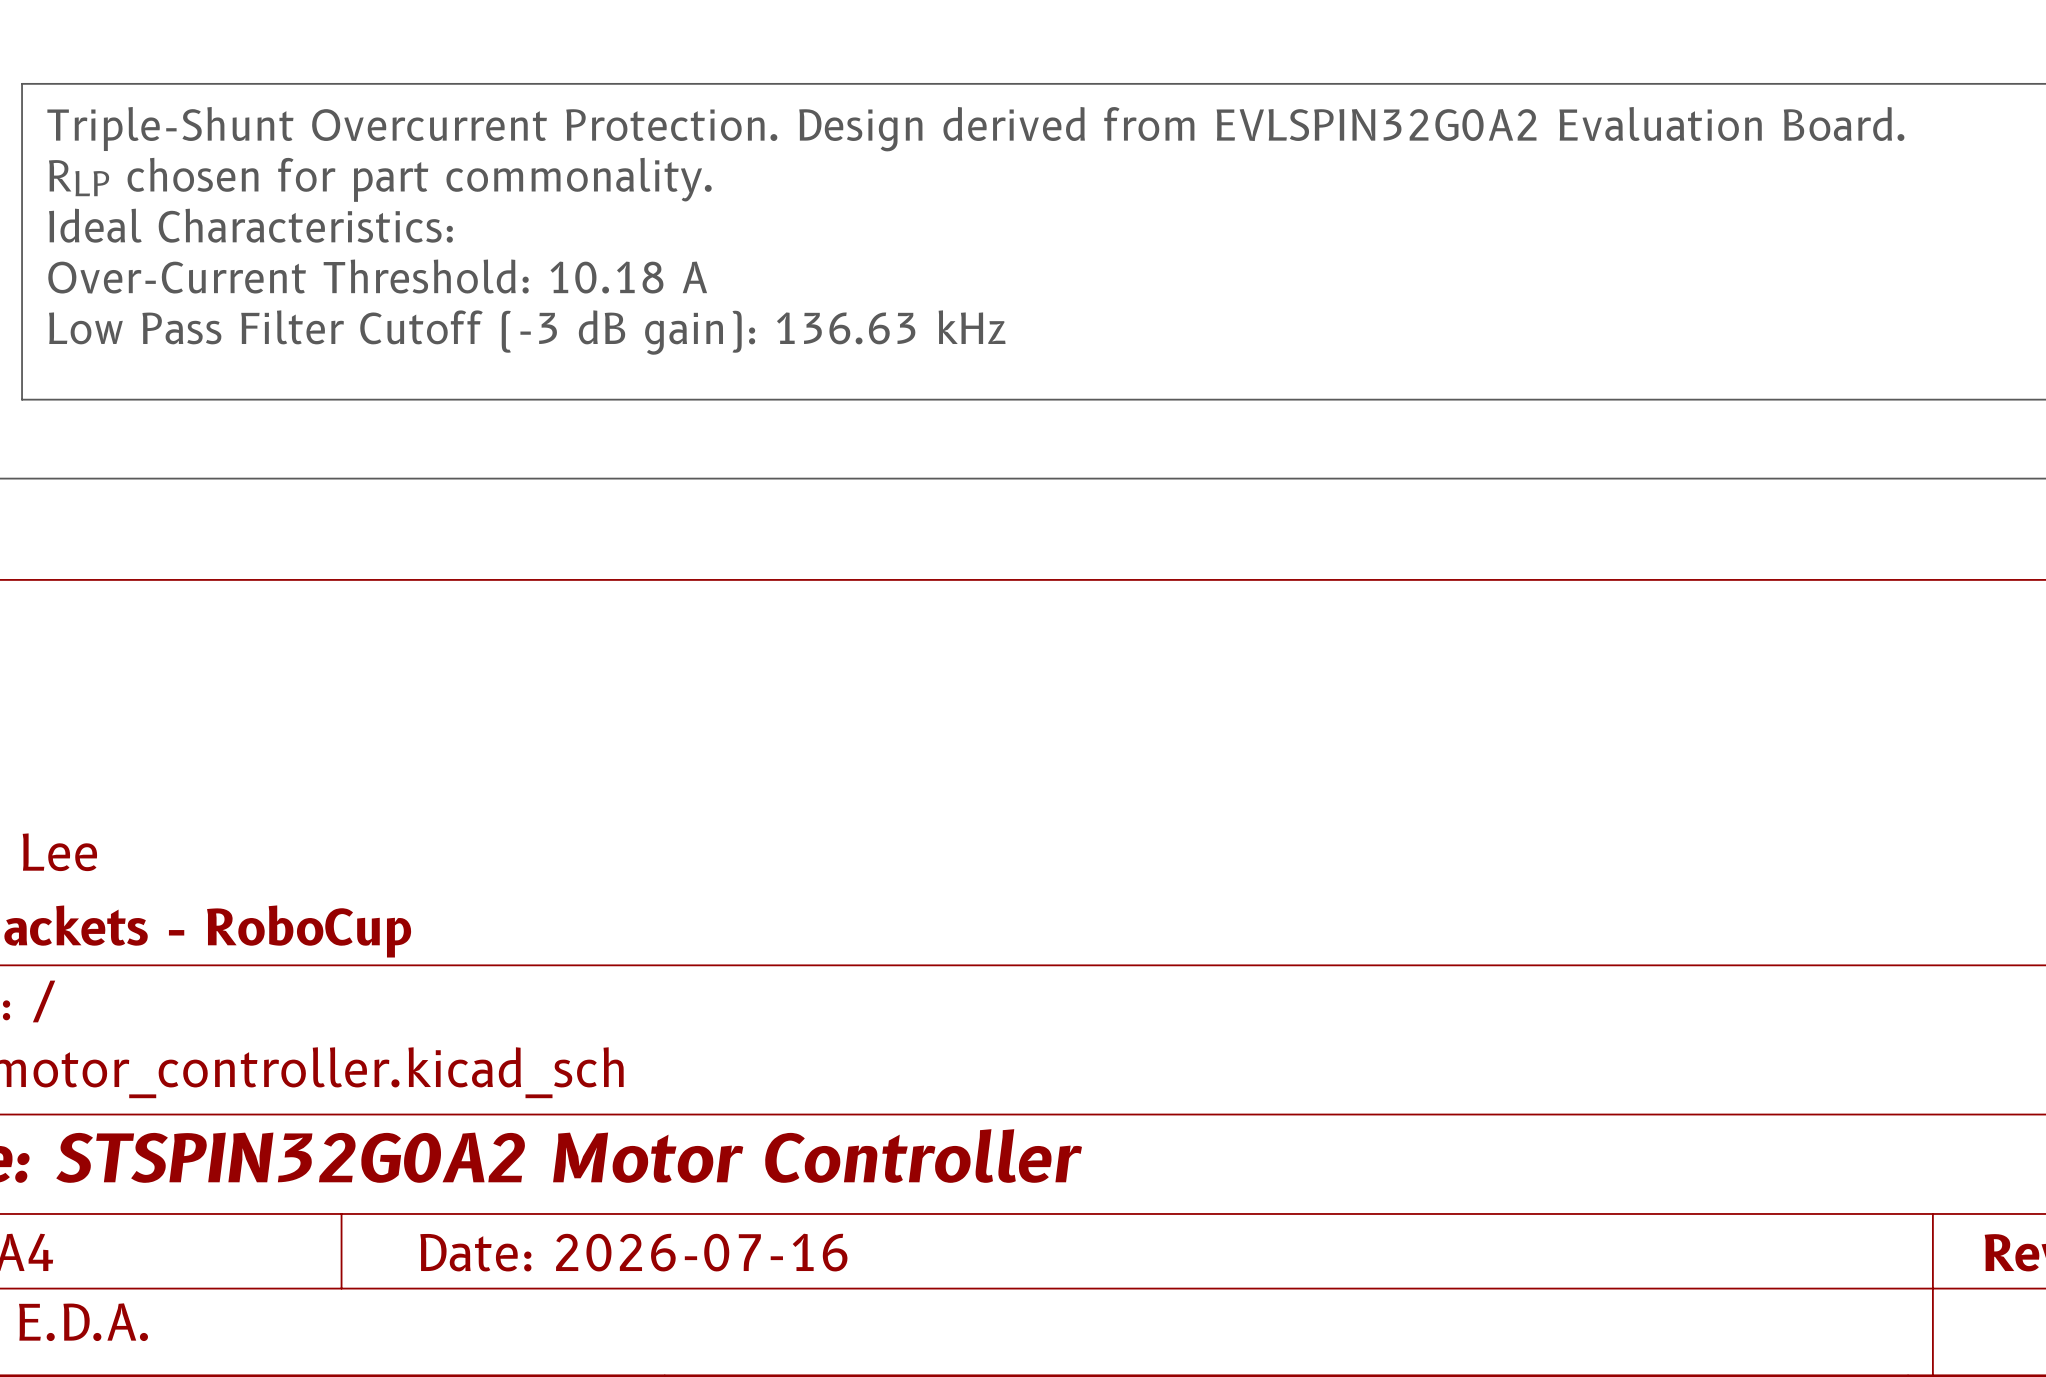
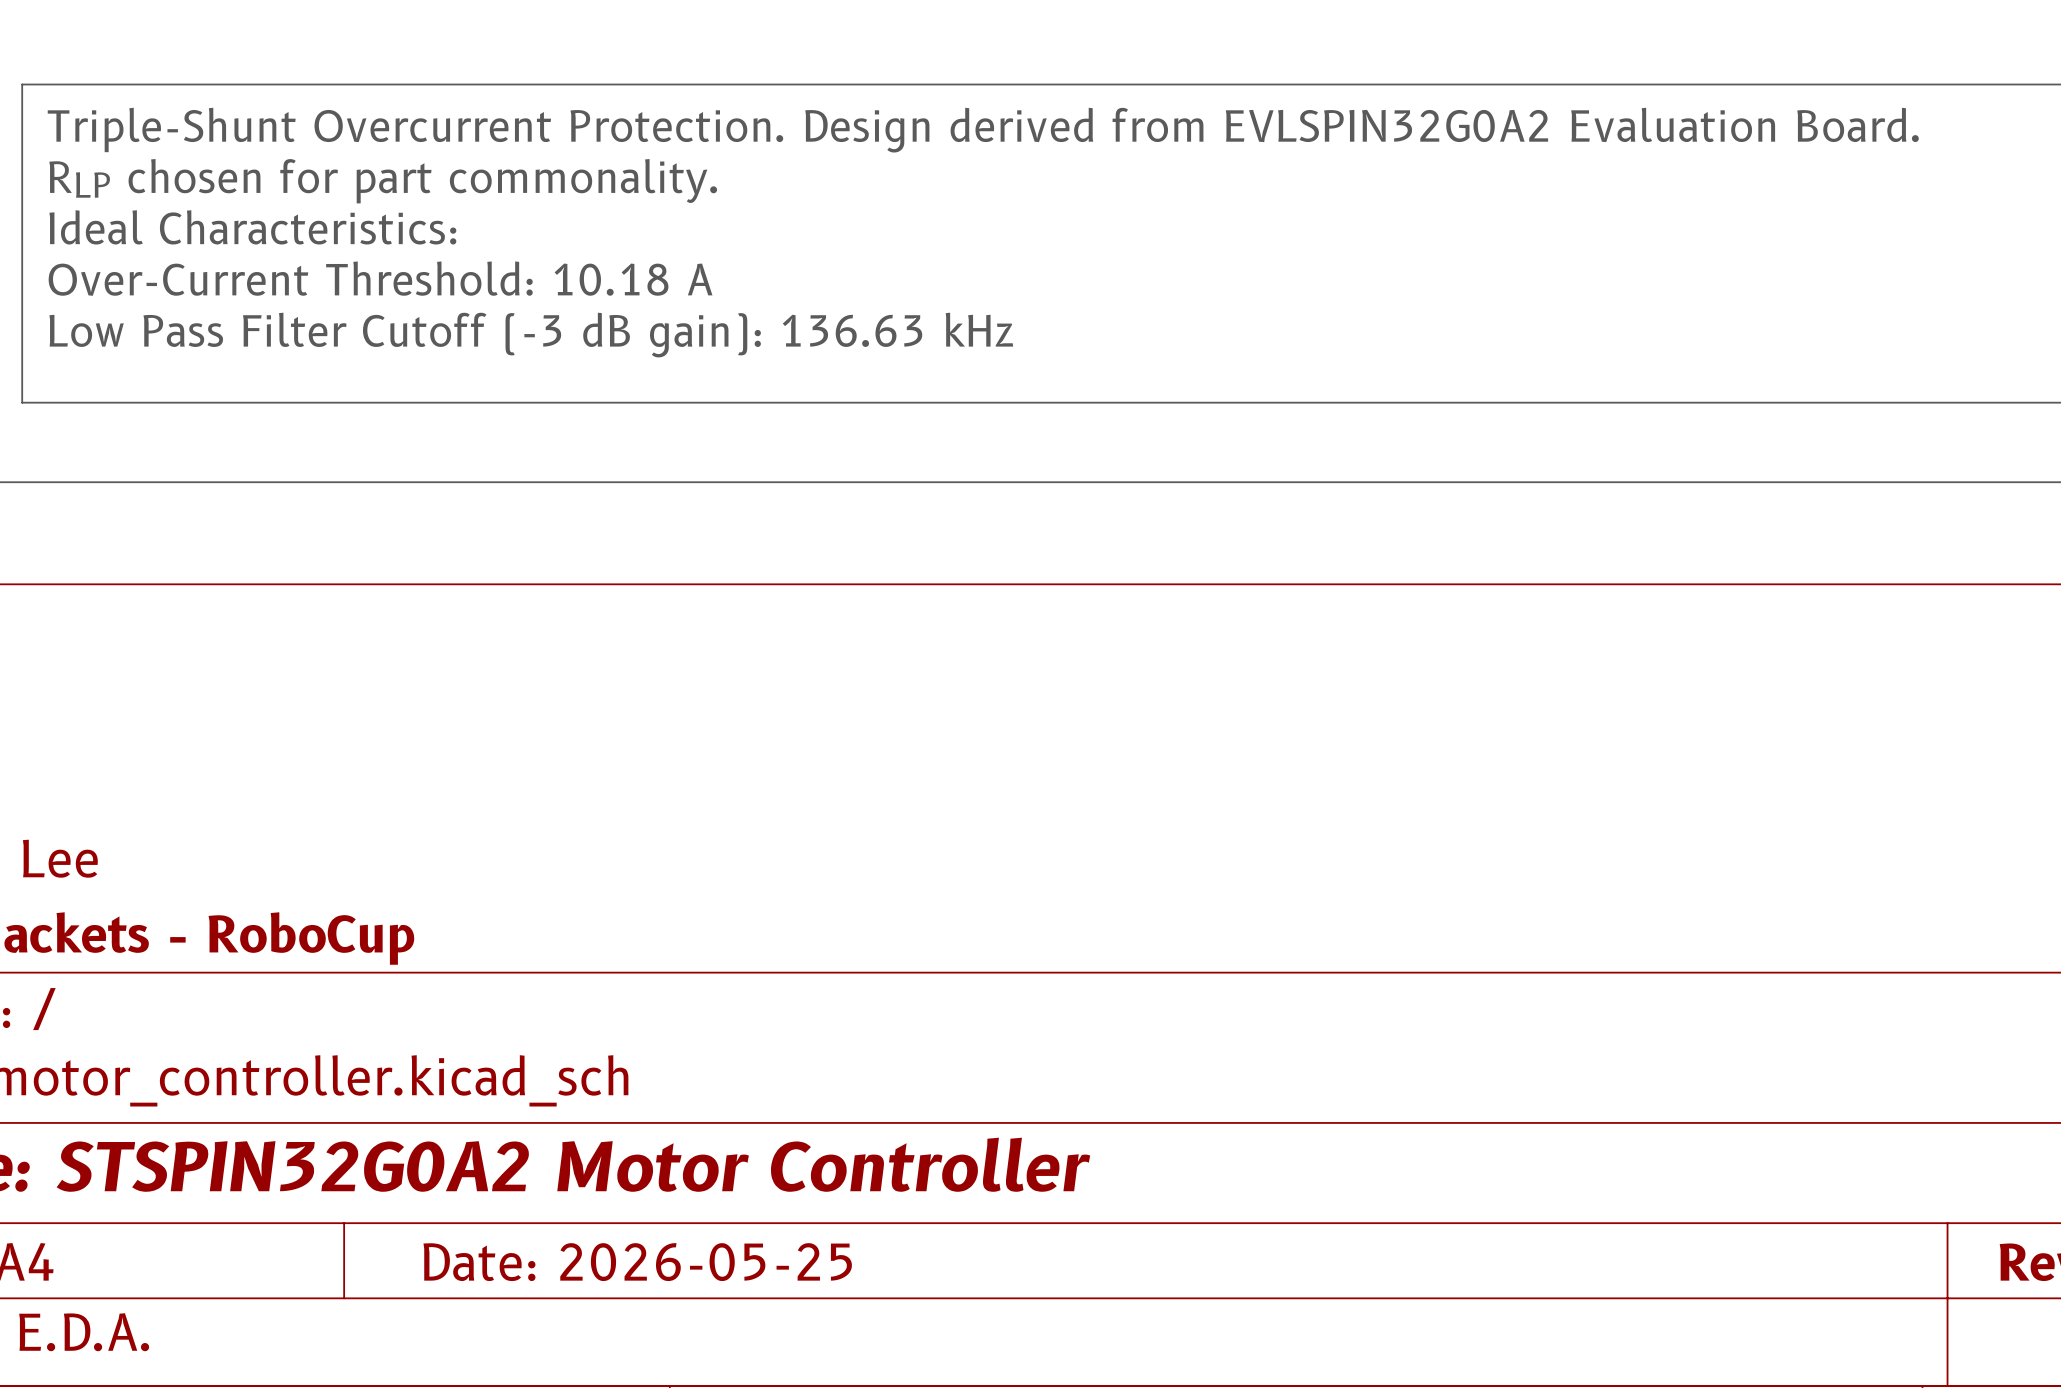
title block: Date: 2026-07-16 (633, 1252) -> Date: 2026-05-25 (637, 1262)

